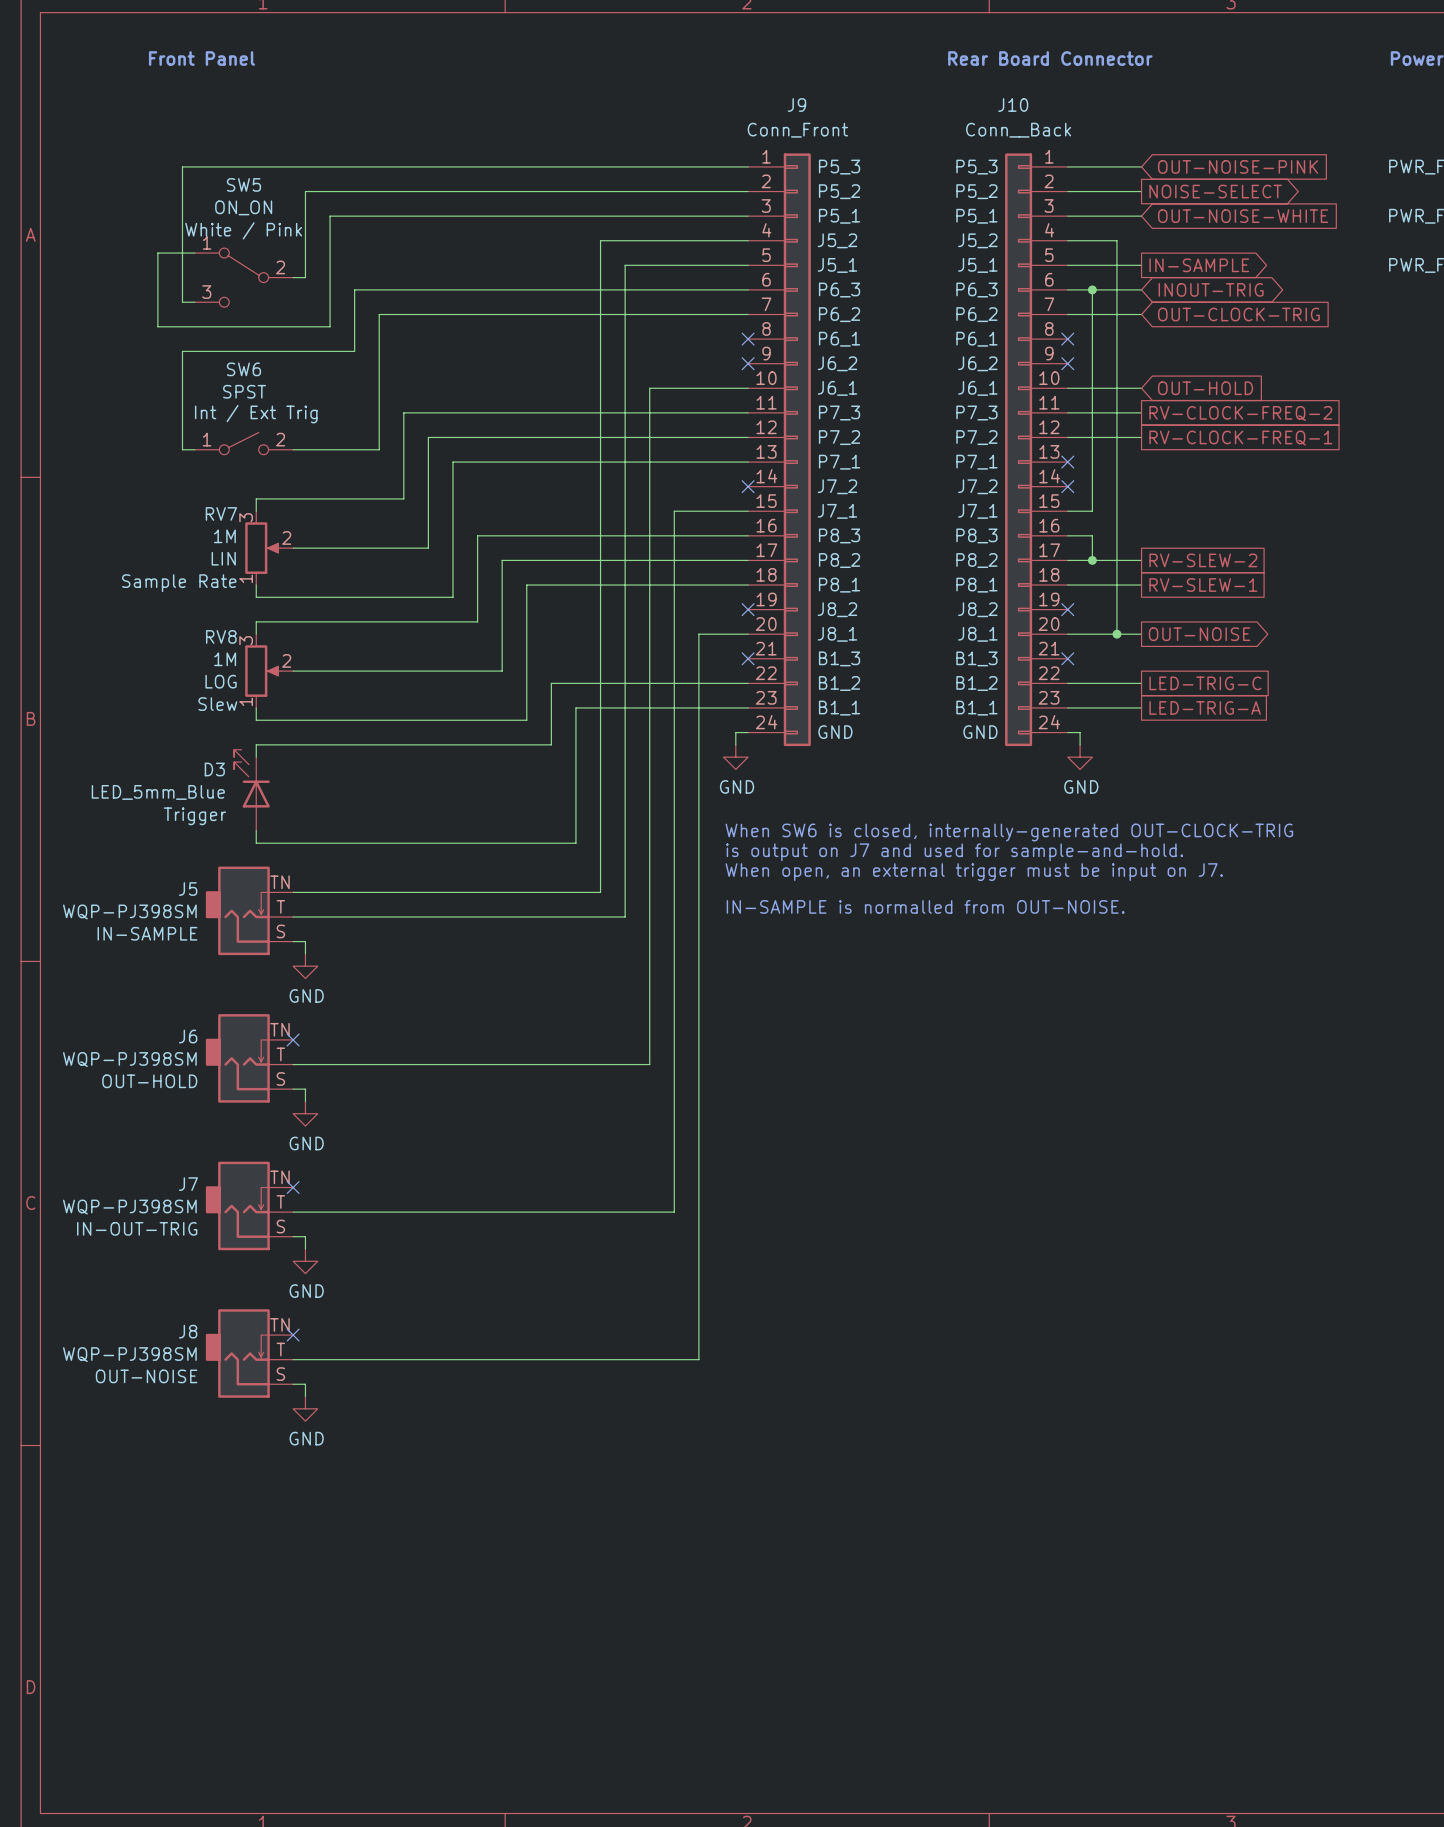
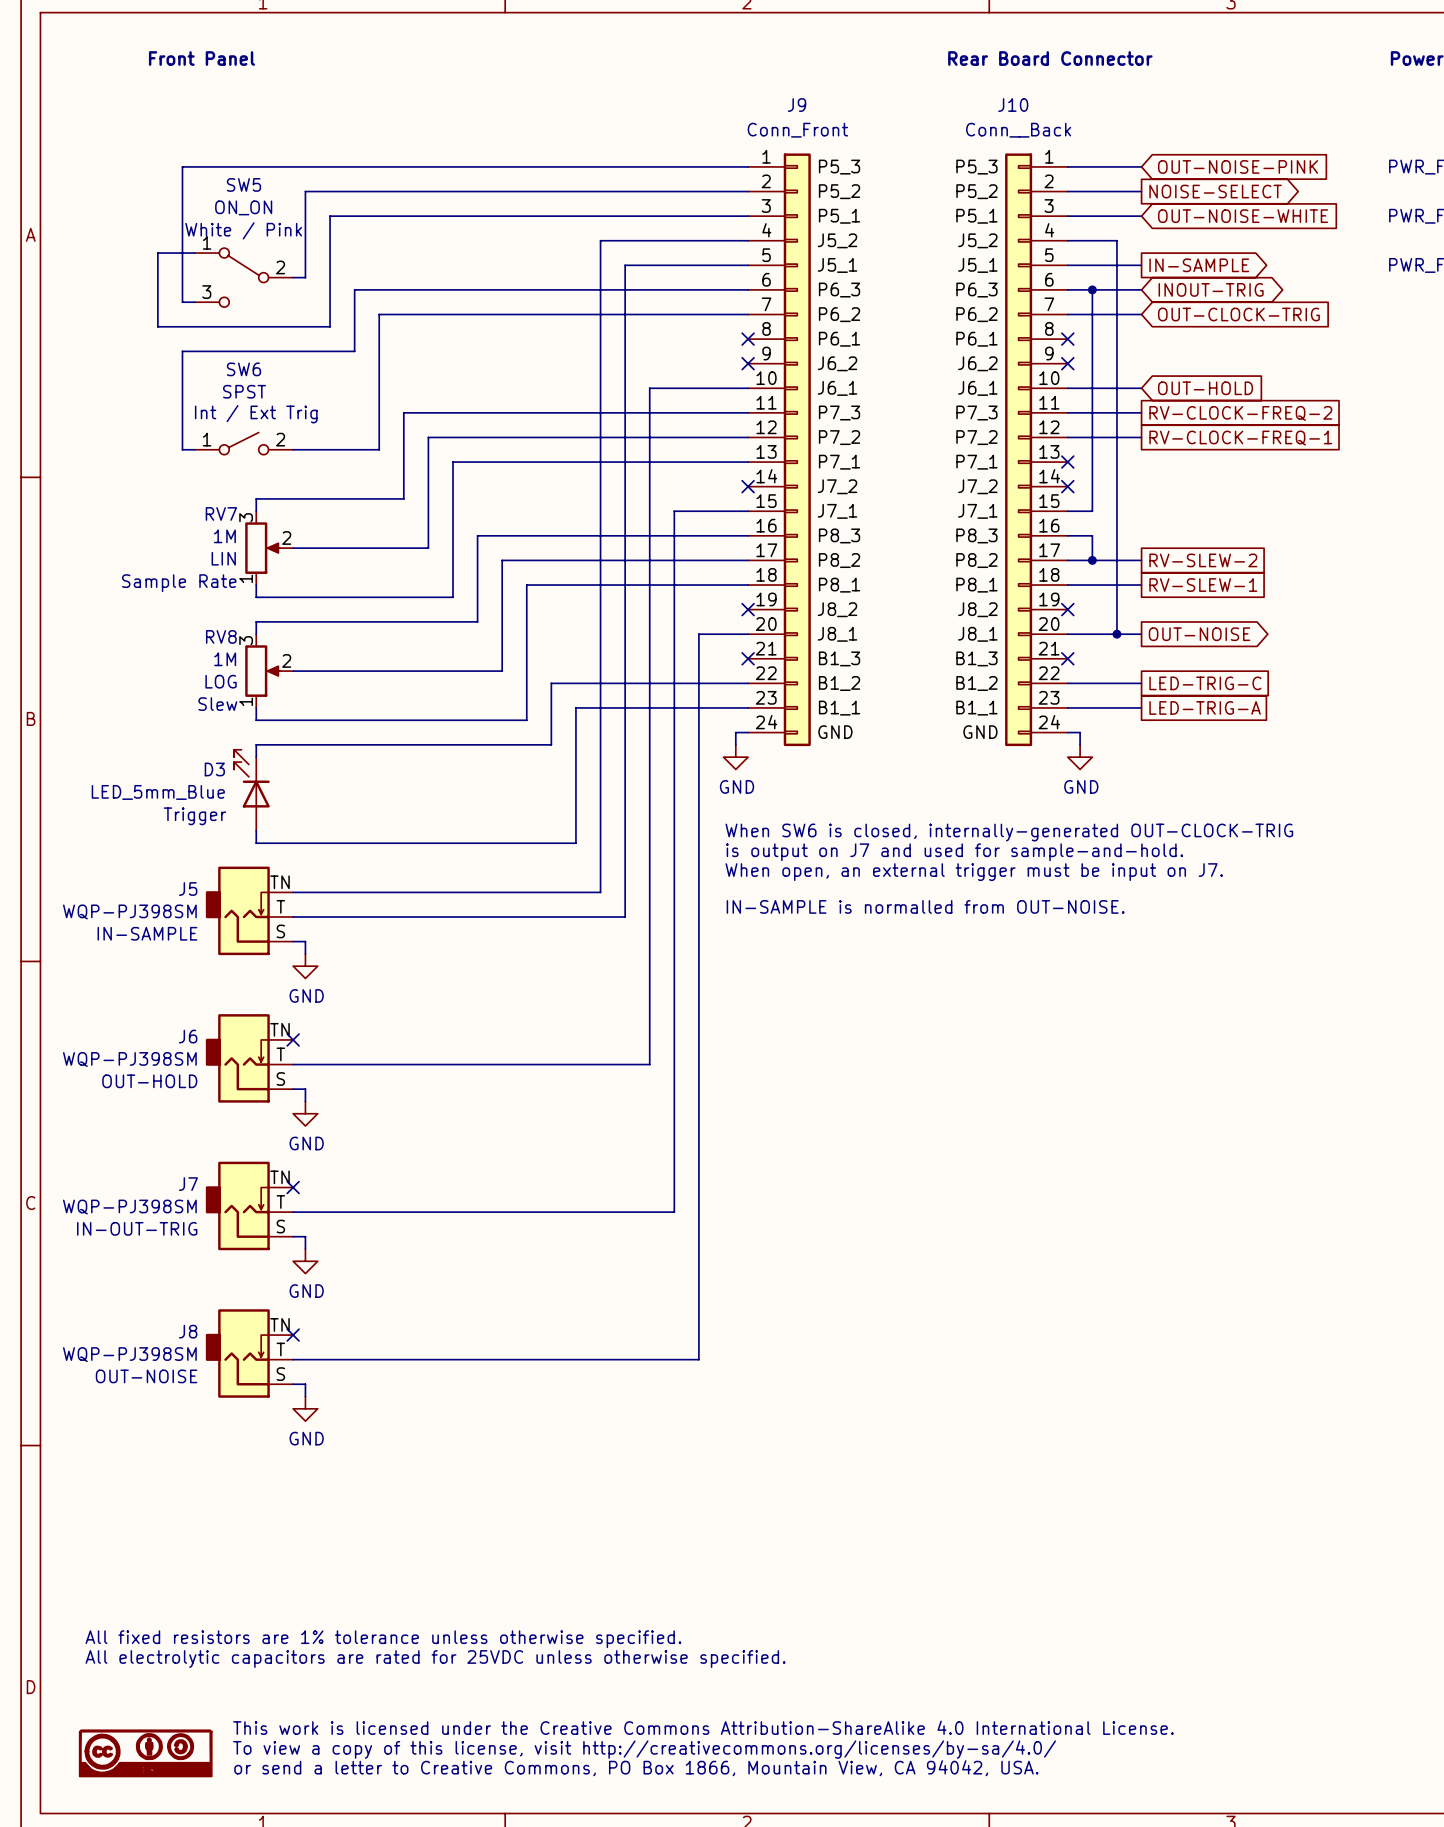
text: none -> All fixed resistors are 1% tolerance unless otherwise specified. (383, 1639)
text: none -> All electrolytic capacitors are rated for 25VDC unless otherwise specified. (435, 1659)
text: none -> This work is licensed under the Creative Commons Attribution-ShareAlike 4.0 International License. (703, 1727)
text: none -> To view a copy of this license, visit http://creativecommons.org/licenses/by-sa/4.0/ (644, 1749)
power symbol: none -> (145, 1753)
text: none -> or send a letter to Creative Commons, PO Box 1866, Mountain View, CA 94042, USA. (636, 1768)

